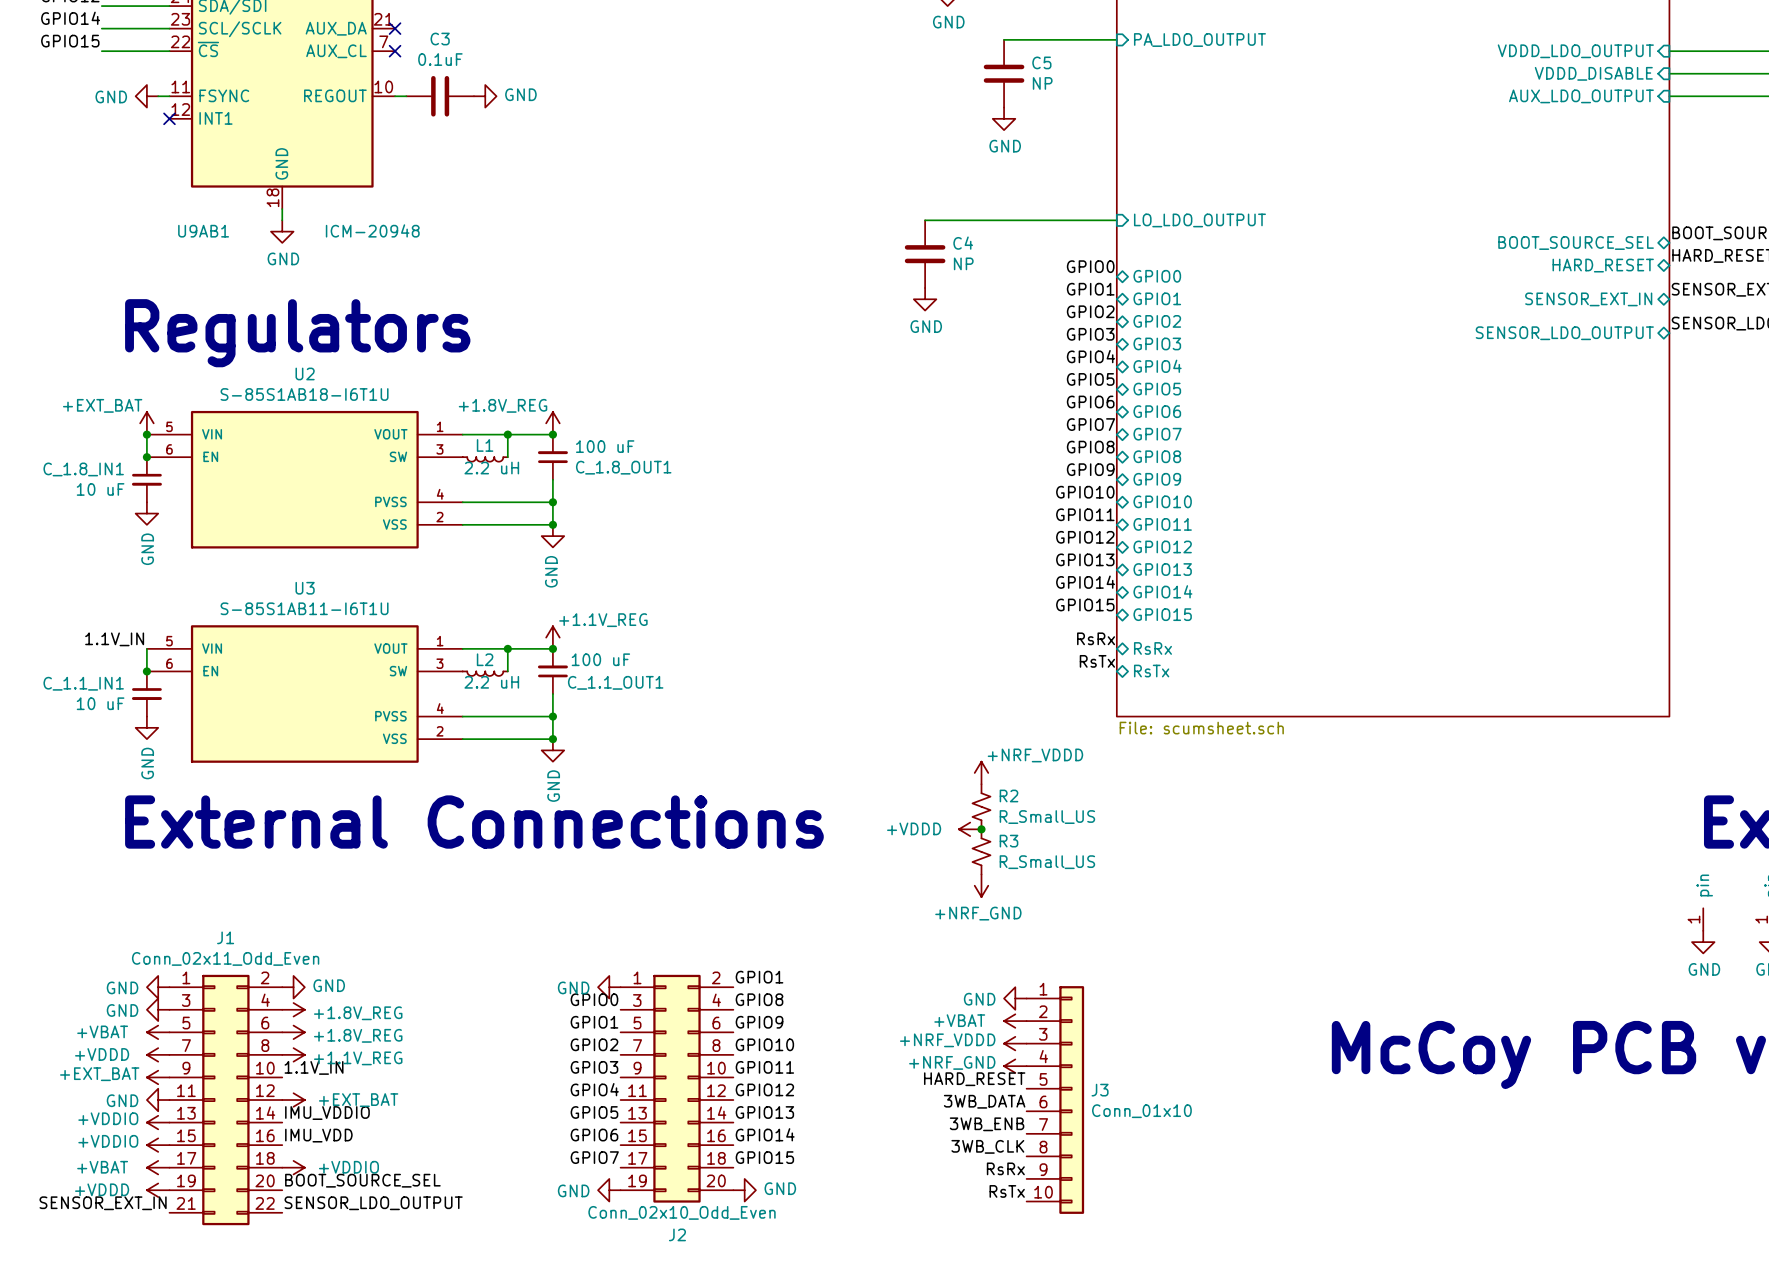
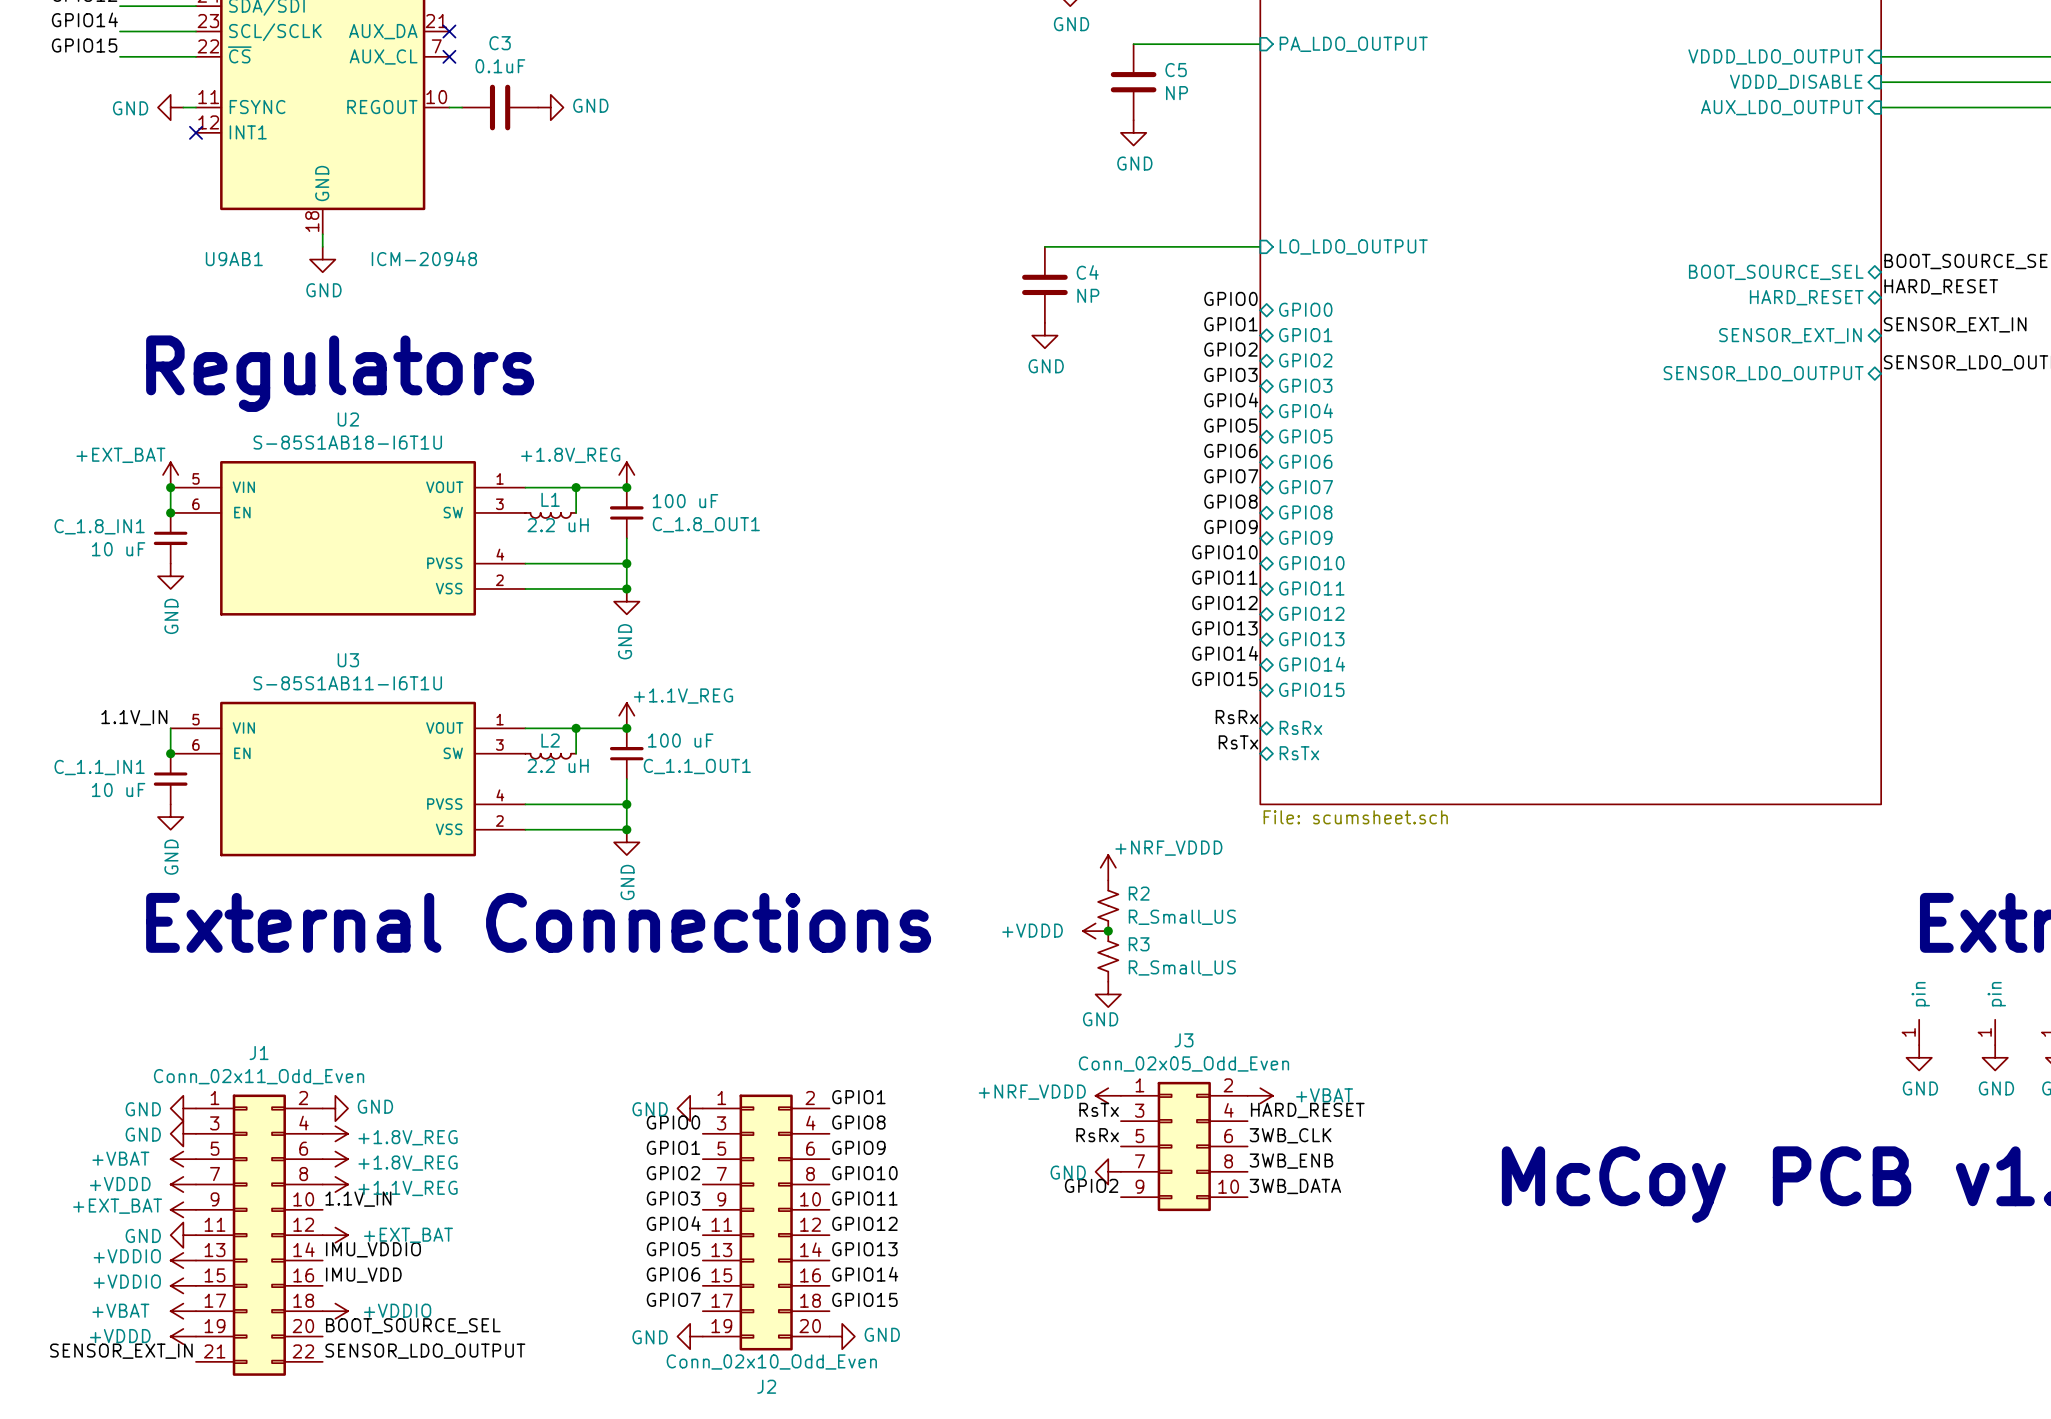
power symbol: +NRF_GND (981, 885) -> GND (1108, 994)
J3 symbol: [1026, 986, 1085, 1214] -> [1120, 1081, 1248, 1212]
power symbol position: GND (1015, 998) -> GND (1108, 1171)
power symbol rotation: 0° (1015, 1021) -> 180° (1260, 1095)
power symbol position: +VBAT (1015, 1021) -> +VBAT (1260, 1095)
power symbol position: +NRF_VDDD (1015, 1043) -> +NRF_VDDD (1108, 1095)
label: none -> GPIO2 (1091, 1185)
power symbol: +NRF_GND (1015, 1066) -> none
label position: HARD_RESET (974, 1079) -> HARD_RESET (1307, 1110)
J3 name position: J3 (1100, 1090) -> J3 (1183, 1040)
label position: 3WB_DATA (984, 1101) -> 3WB_DATA (1295, 1186)
J3 value: Conn_01x10 (1141, 1111) -> Conn_02x05_Odd_Even (1183, 1064)
label position: 3WB_ENB (987, 1124) -> 3WB_ENB (1291, 1161)
label position: 3WB_CLK (987, 1146) -> 3WB_CLK (1290, 1135)
label position: RsRx (1005, 1168) -> RsRx (1097, 1135)
label position: RsTx (1007, 1191) -> RsTx (1099, 1109)

